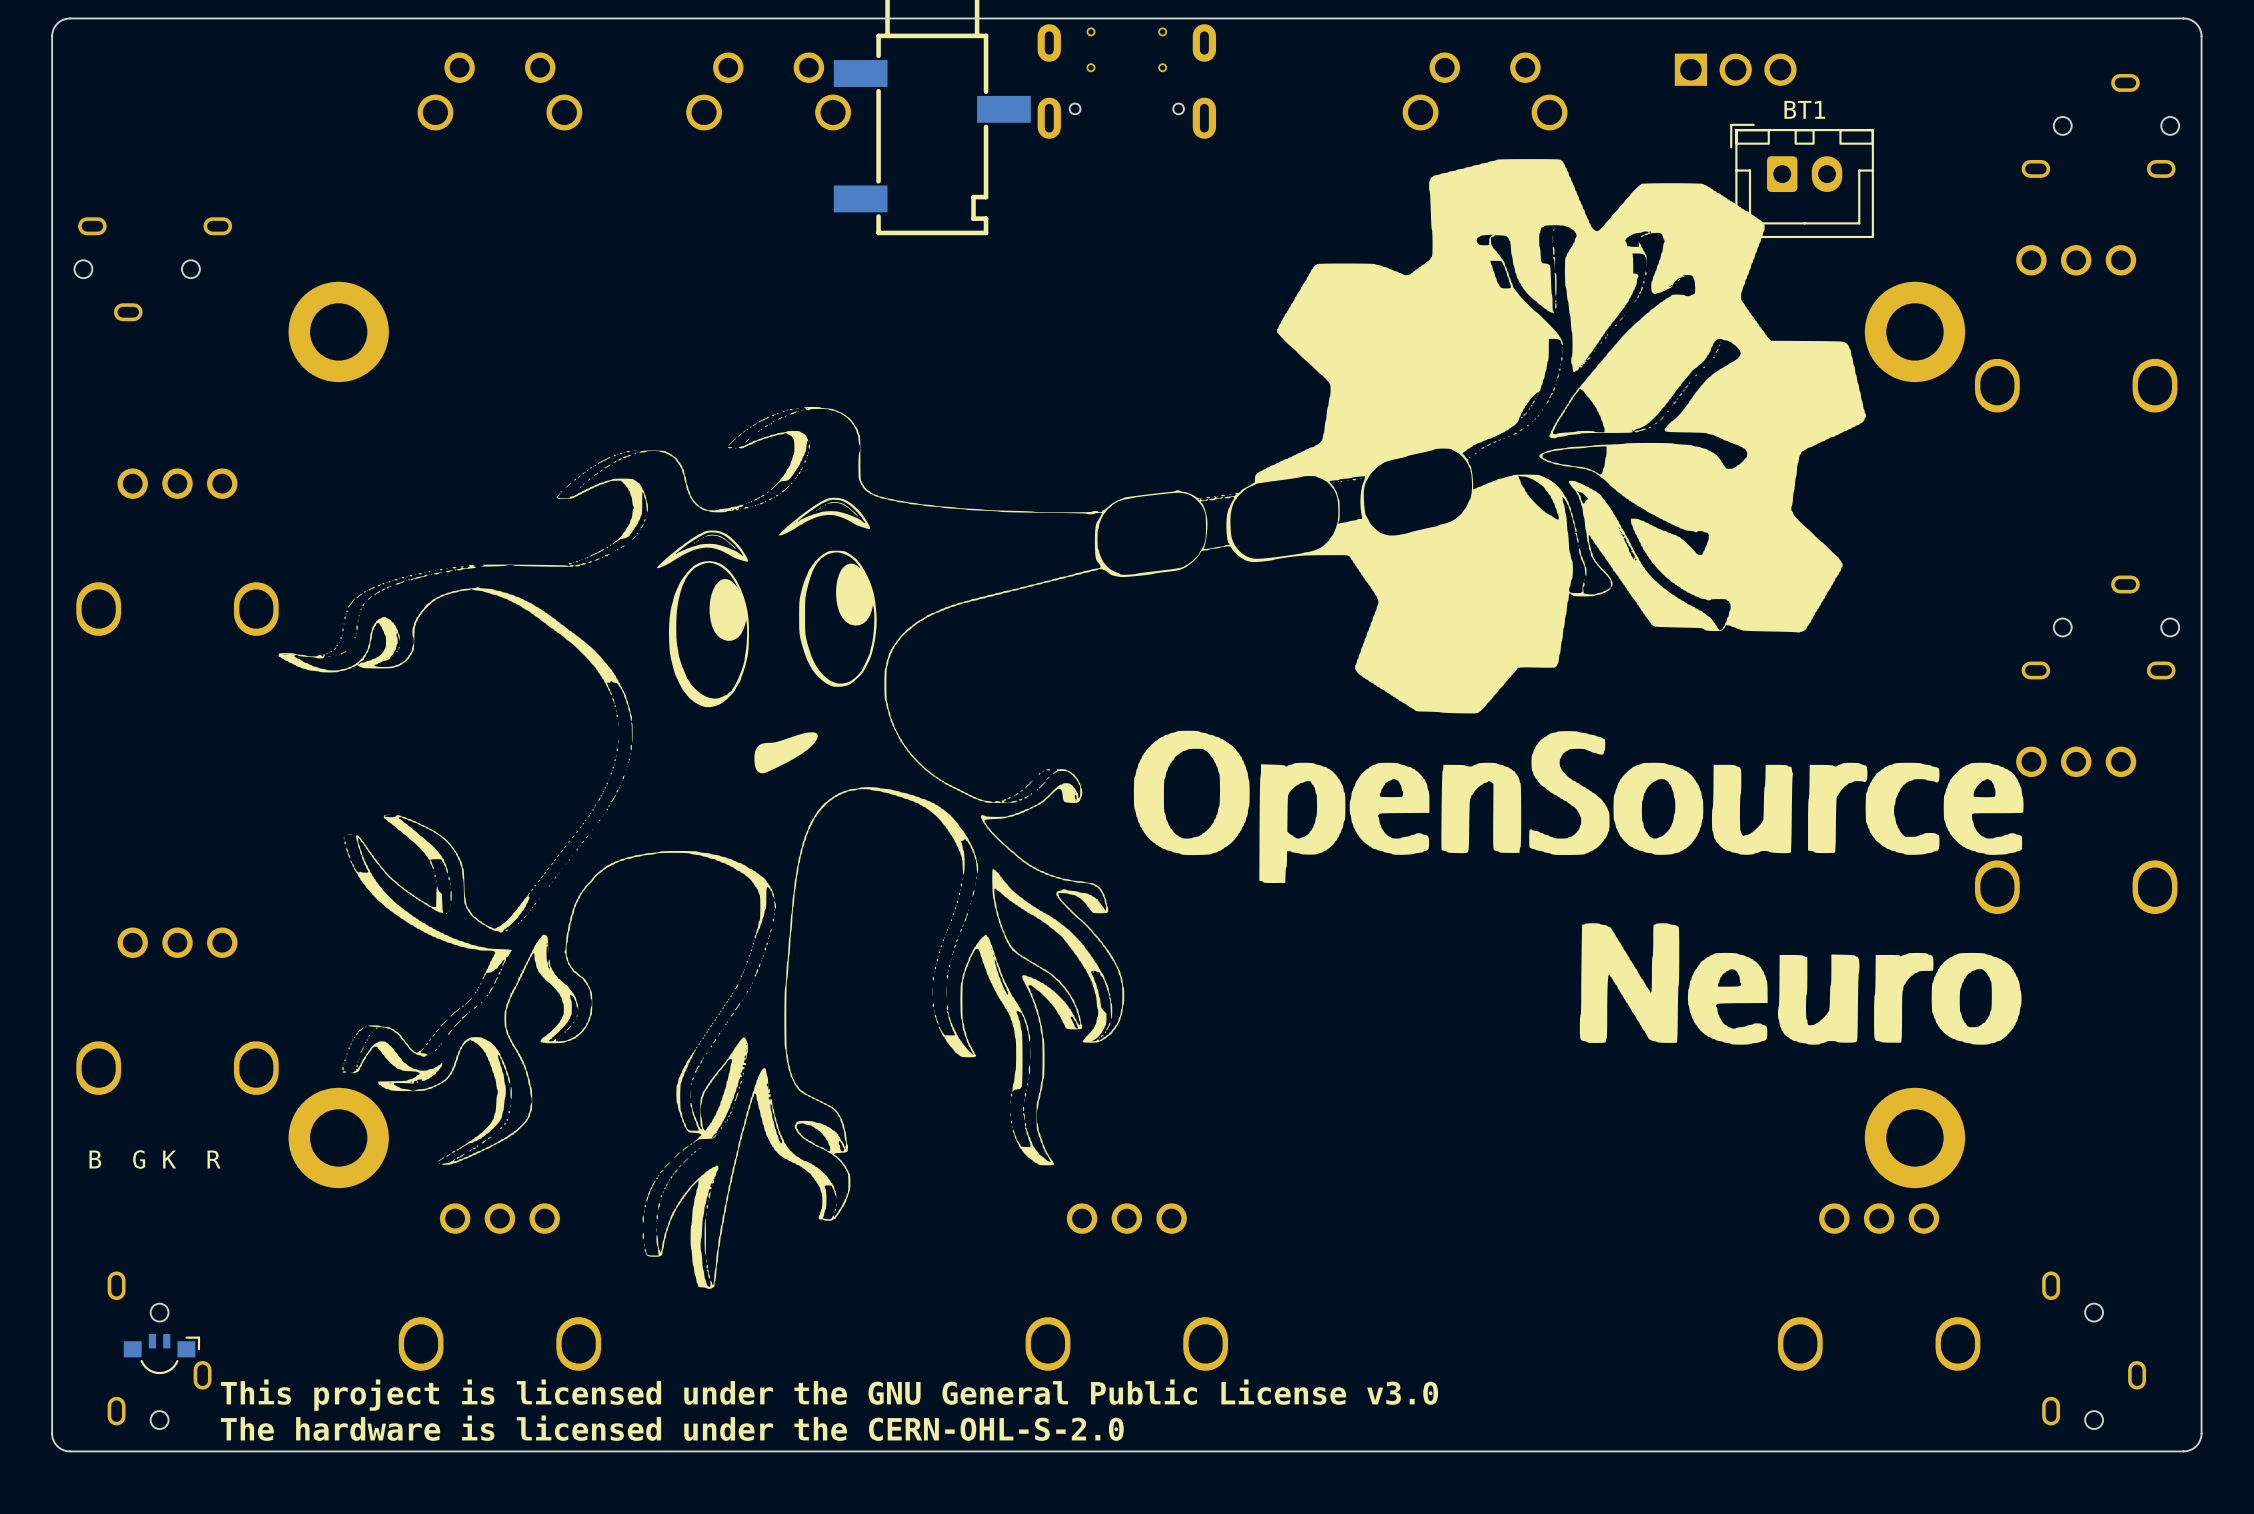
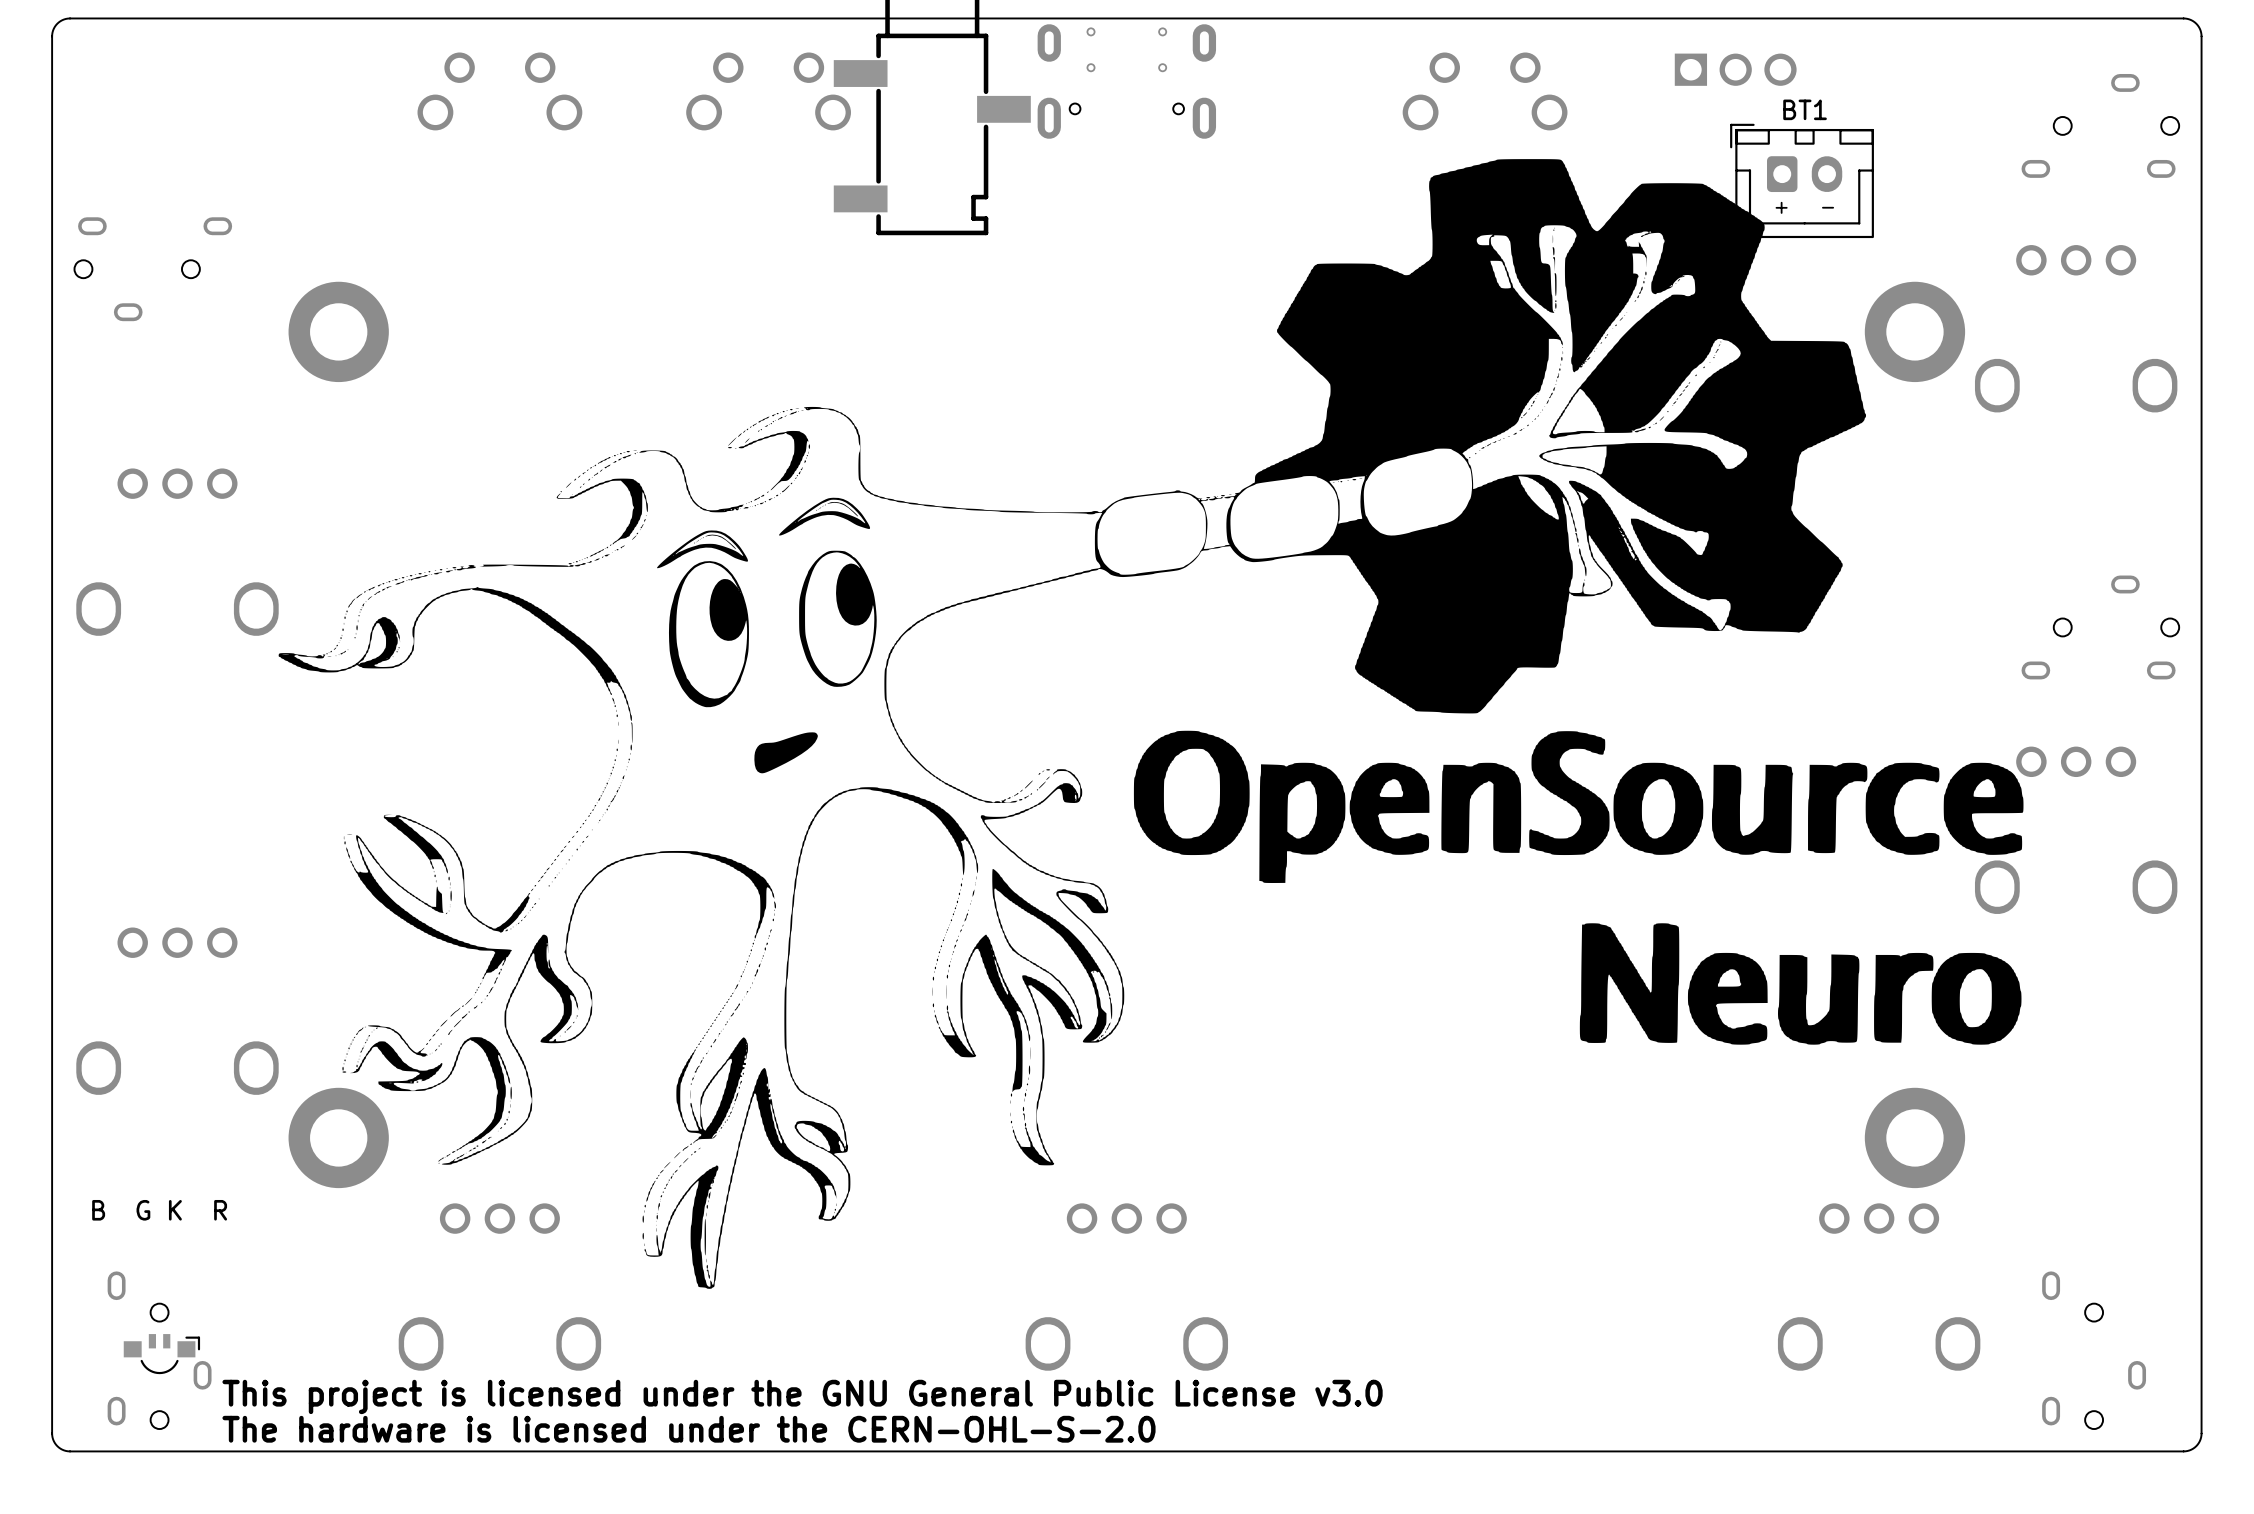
text: none -> + (1781, 207)
text: none -> - (1828, 207)
text position: B G K R (155, 1159) -> B G K R (159, 1210)

